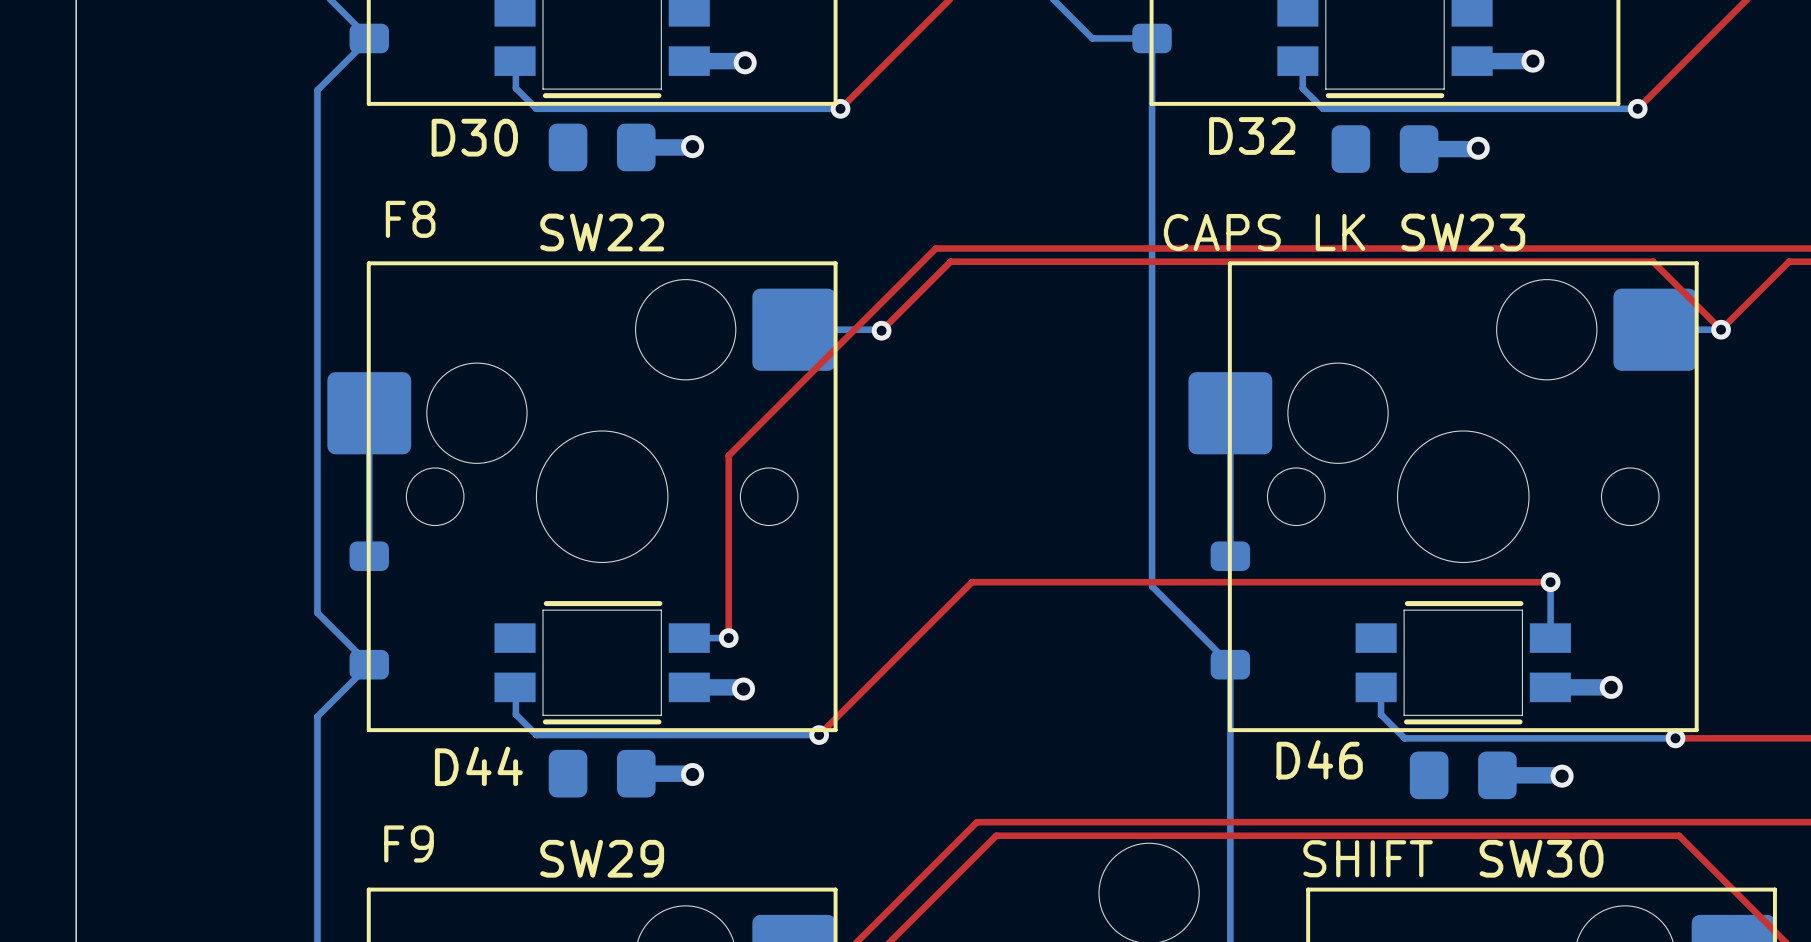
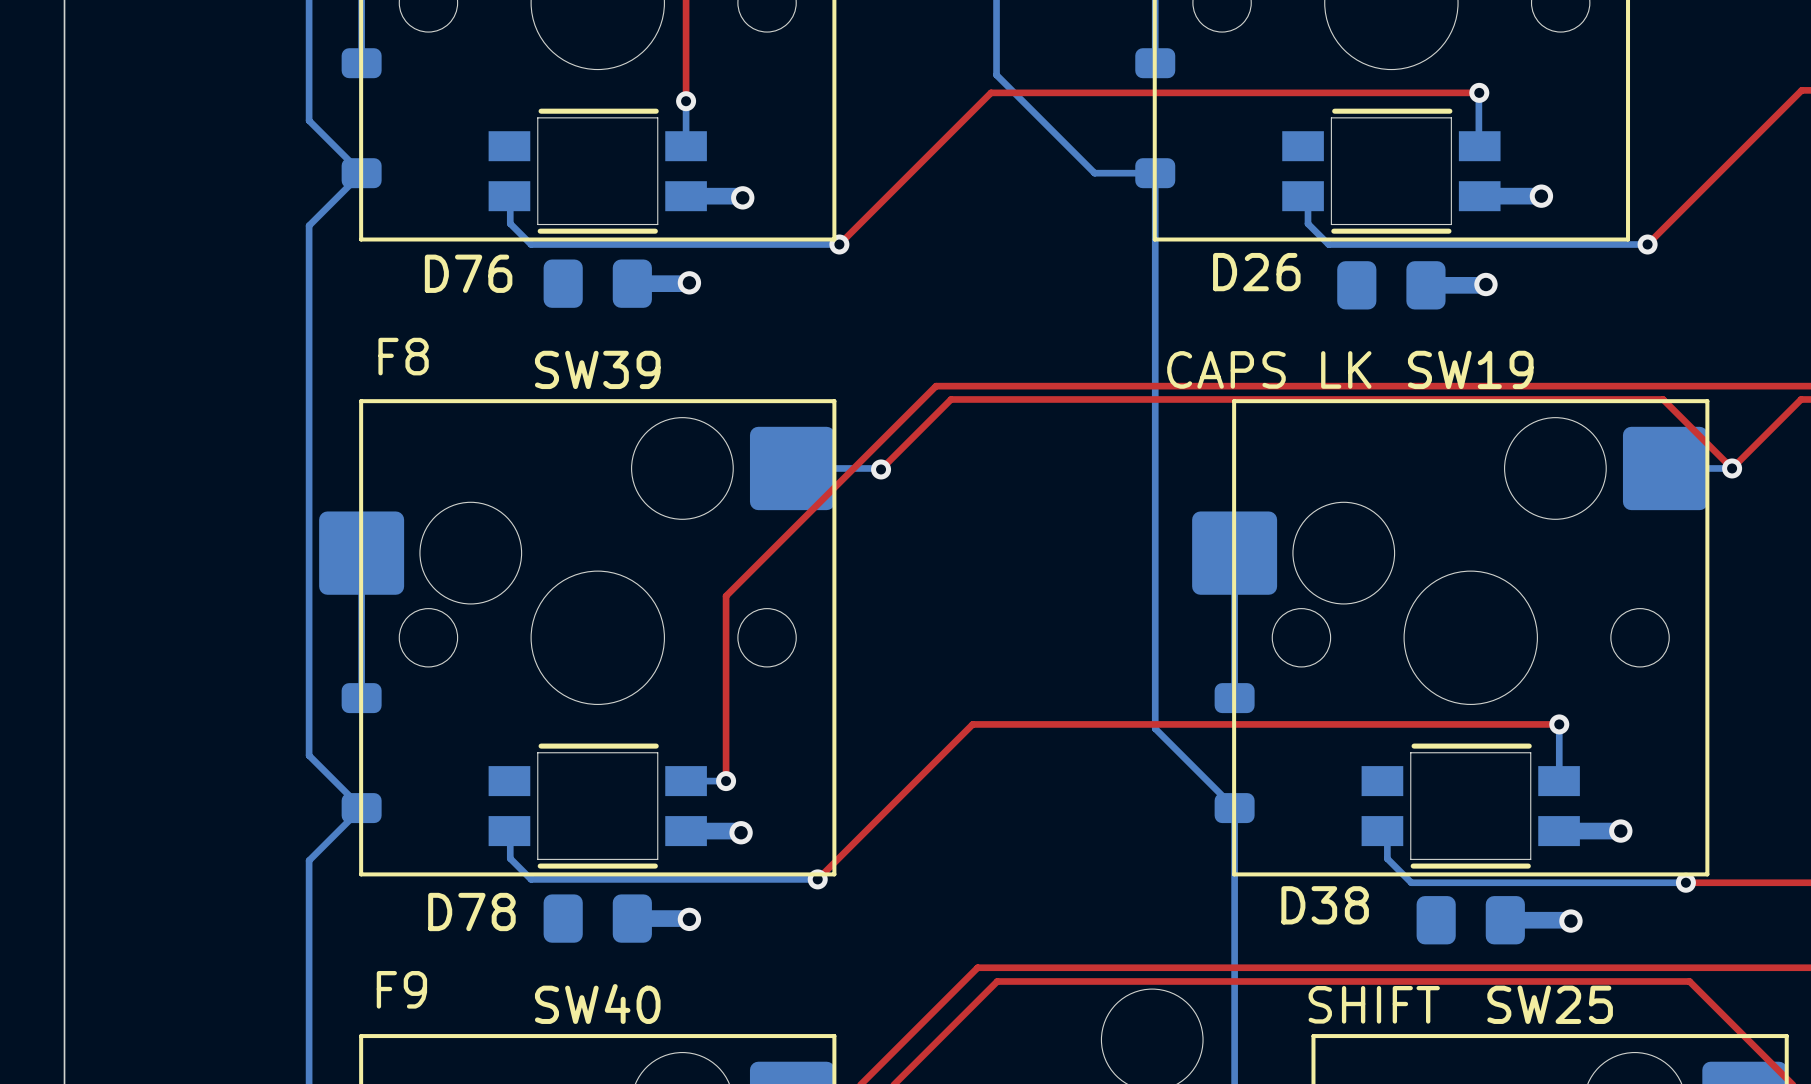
D32 name: D32 (1252, 136) -> D26 (1256, 272)
D30 name: D30 (474, 137) -> D76 (468, 273)
SW22 name: SW22 (602, 232) -> SW39 (597, 369)
SW23 name: SW23 (1463, 232) -> SW19 (1470, 369)
D46 name: D46 (1319, 759) -> D38 (1325, 905)
D44 name: D44 (478, 766) -> D78 (471, 911)
SW29 name: SW29 (602, 858) -> SW40 (597, 1004)
SW30 name: SW30 (1541, 858) -> SW25 (1550, 1004)

